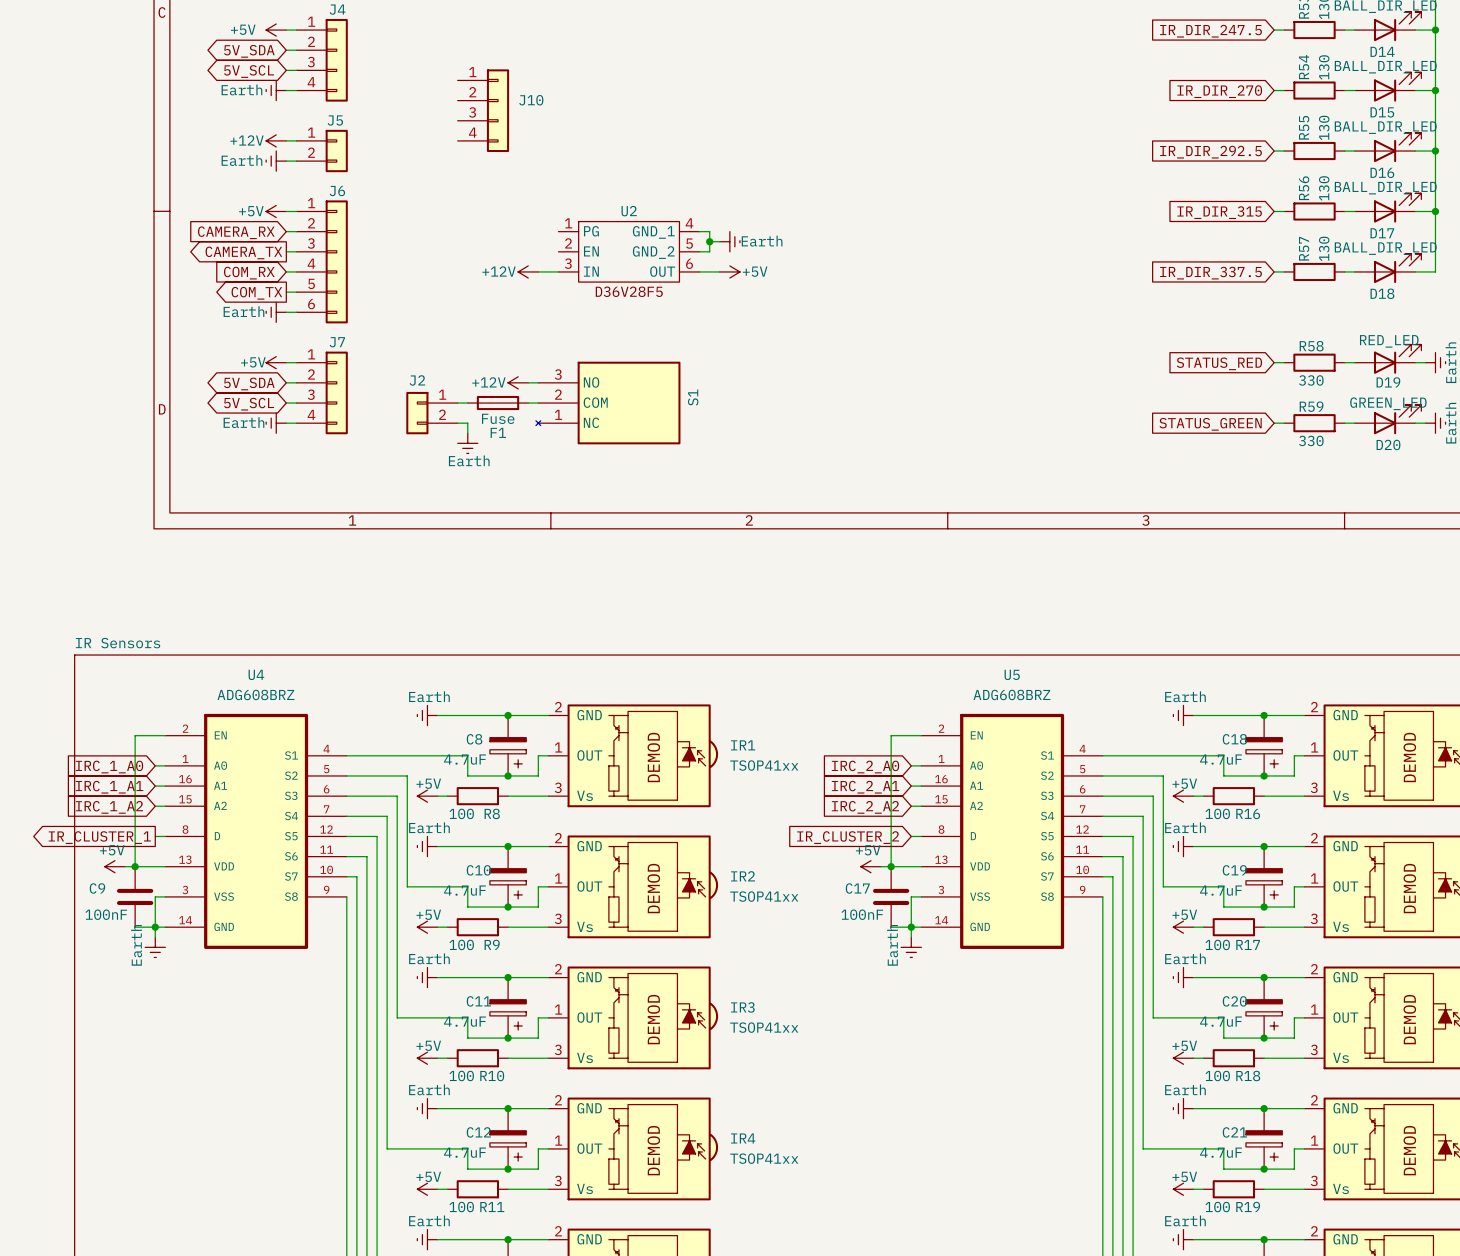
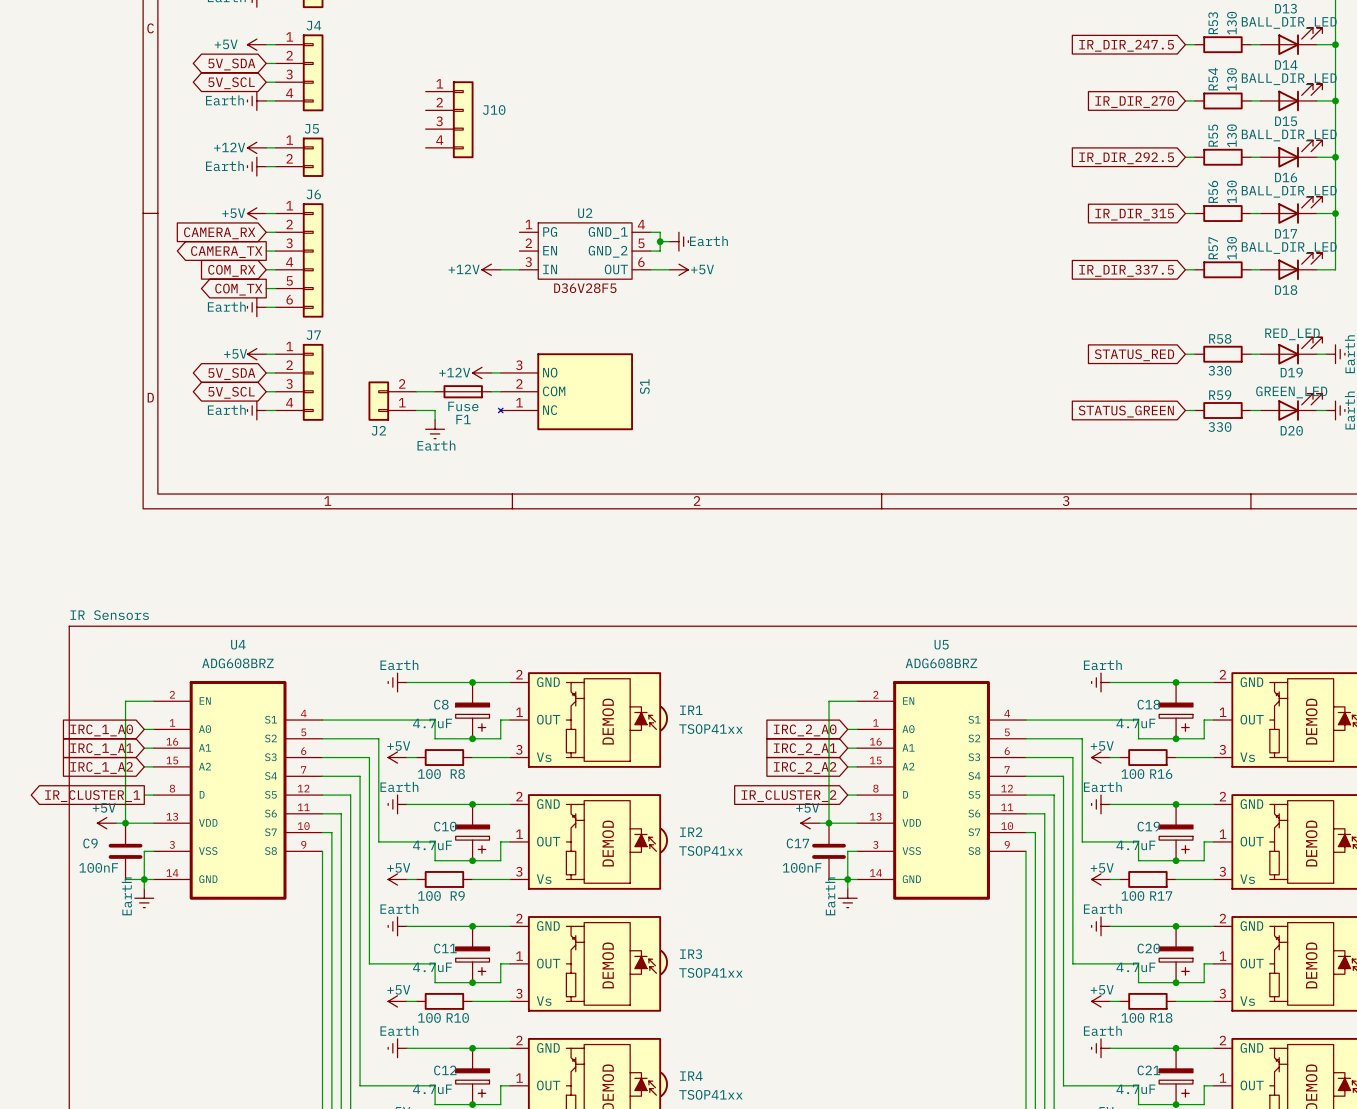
J2 flip: as is (417, 413) -> up-down (378, 401)

